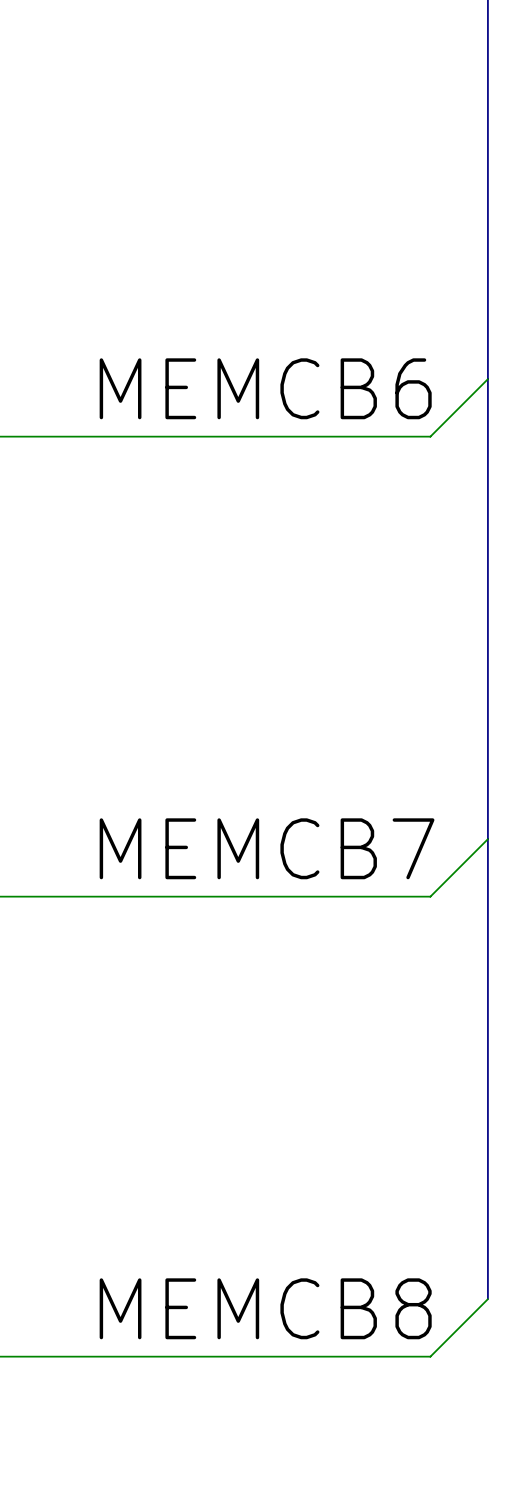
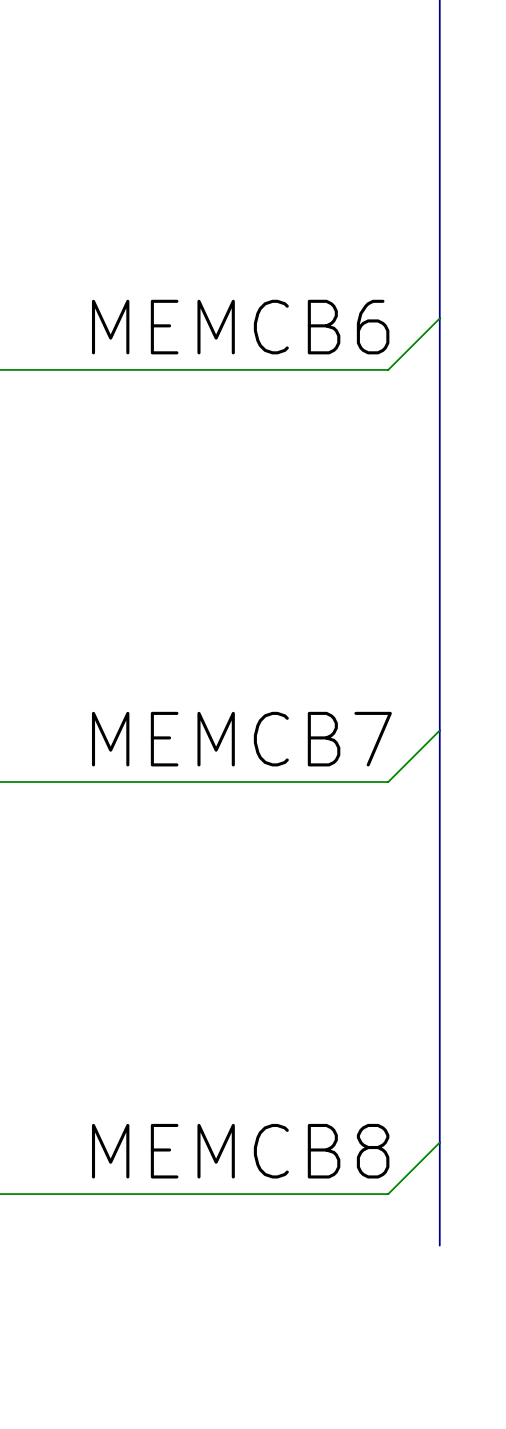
bus: none -> (439, 1142) (439, 1245)

